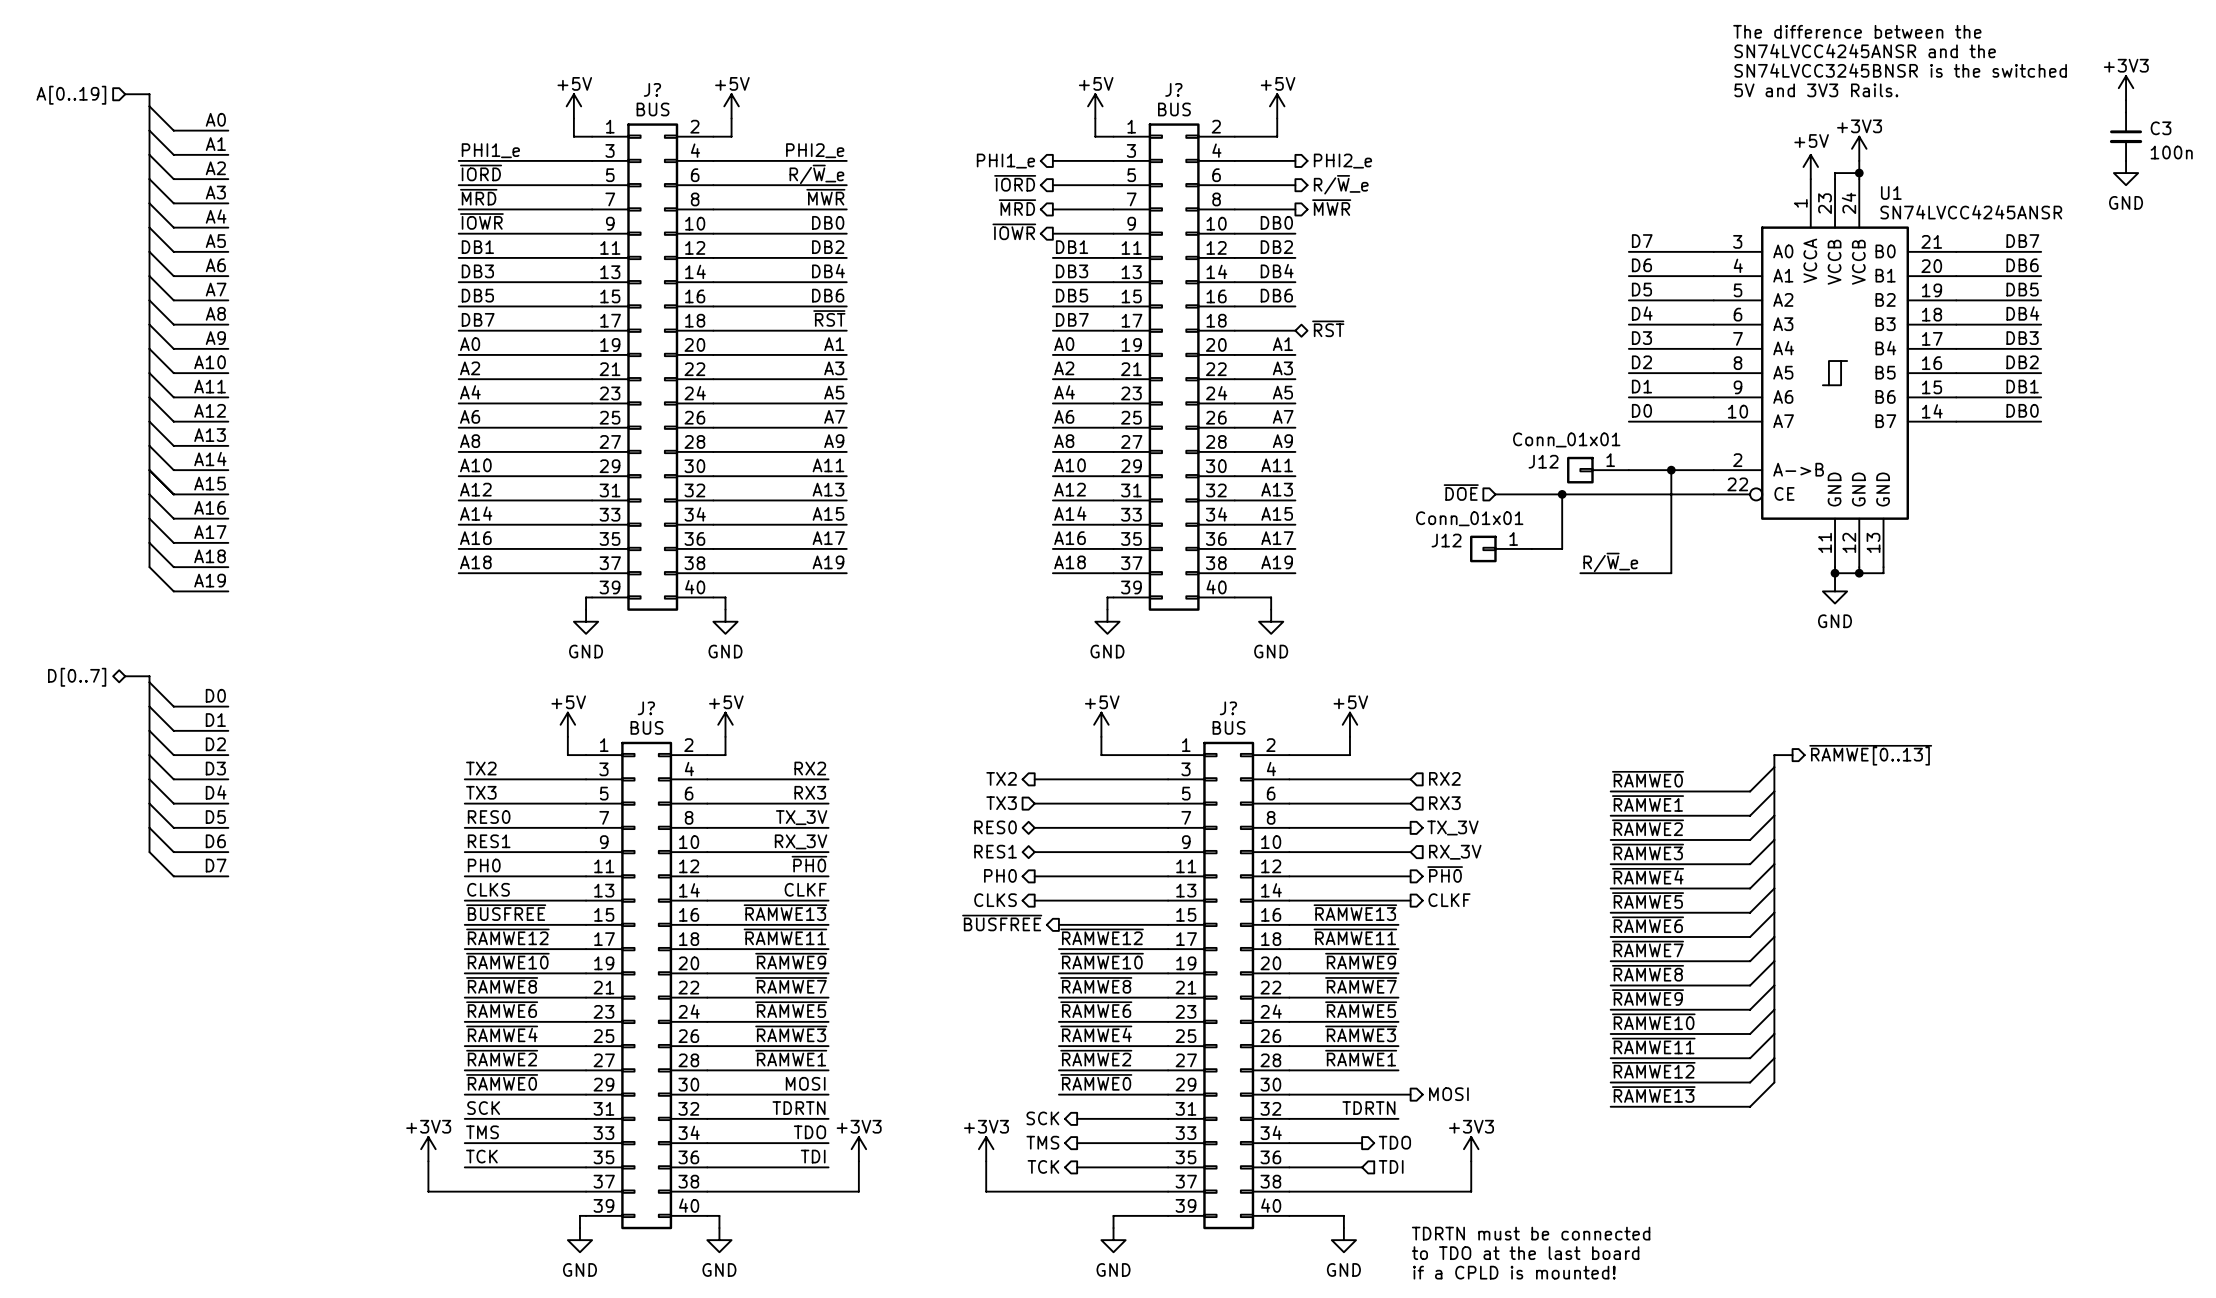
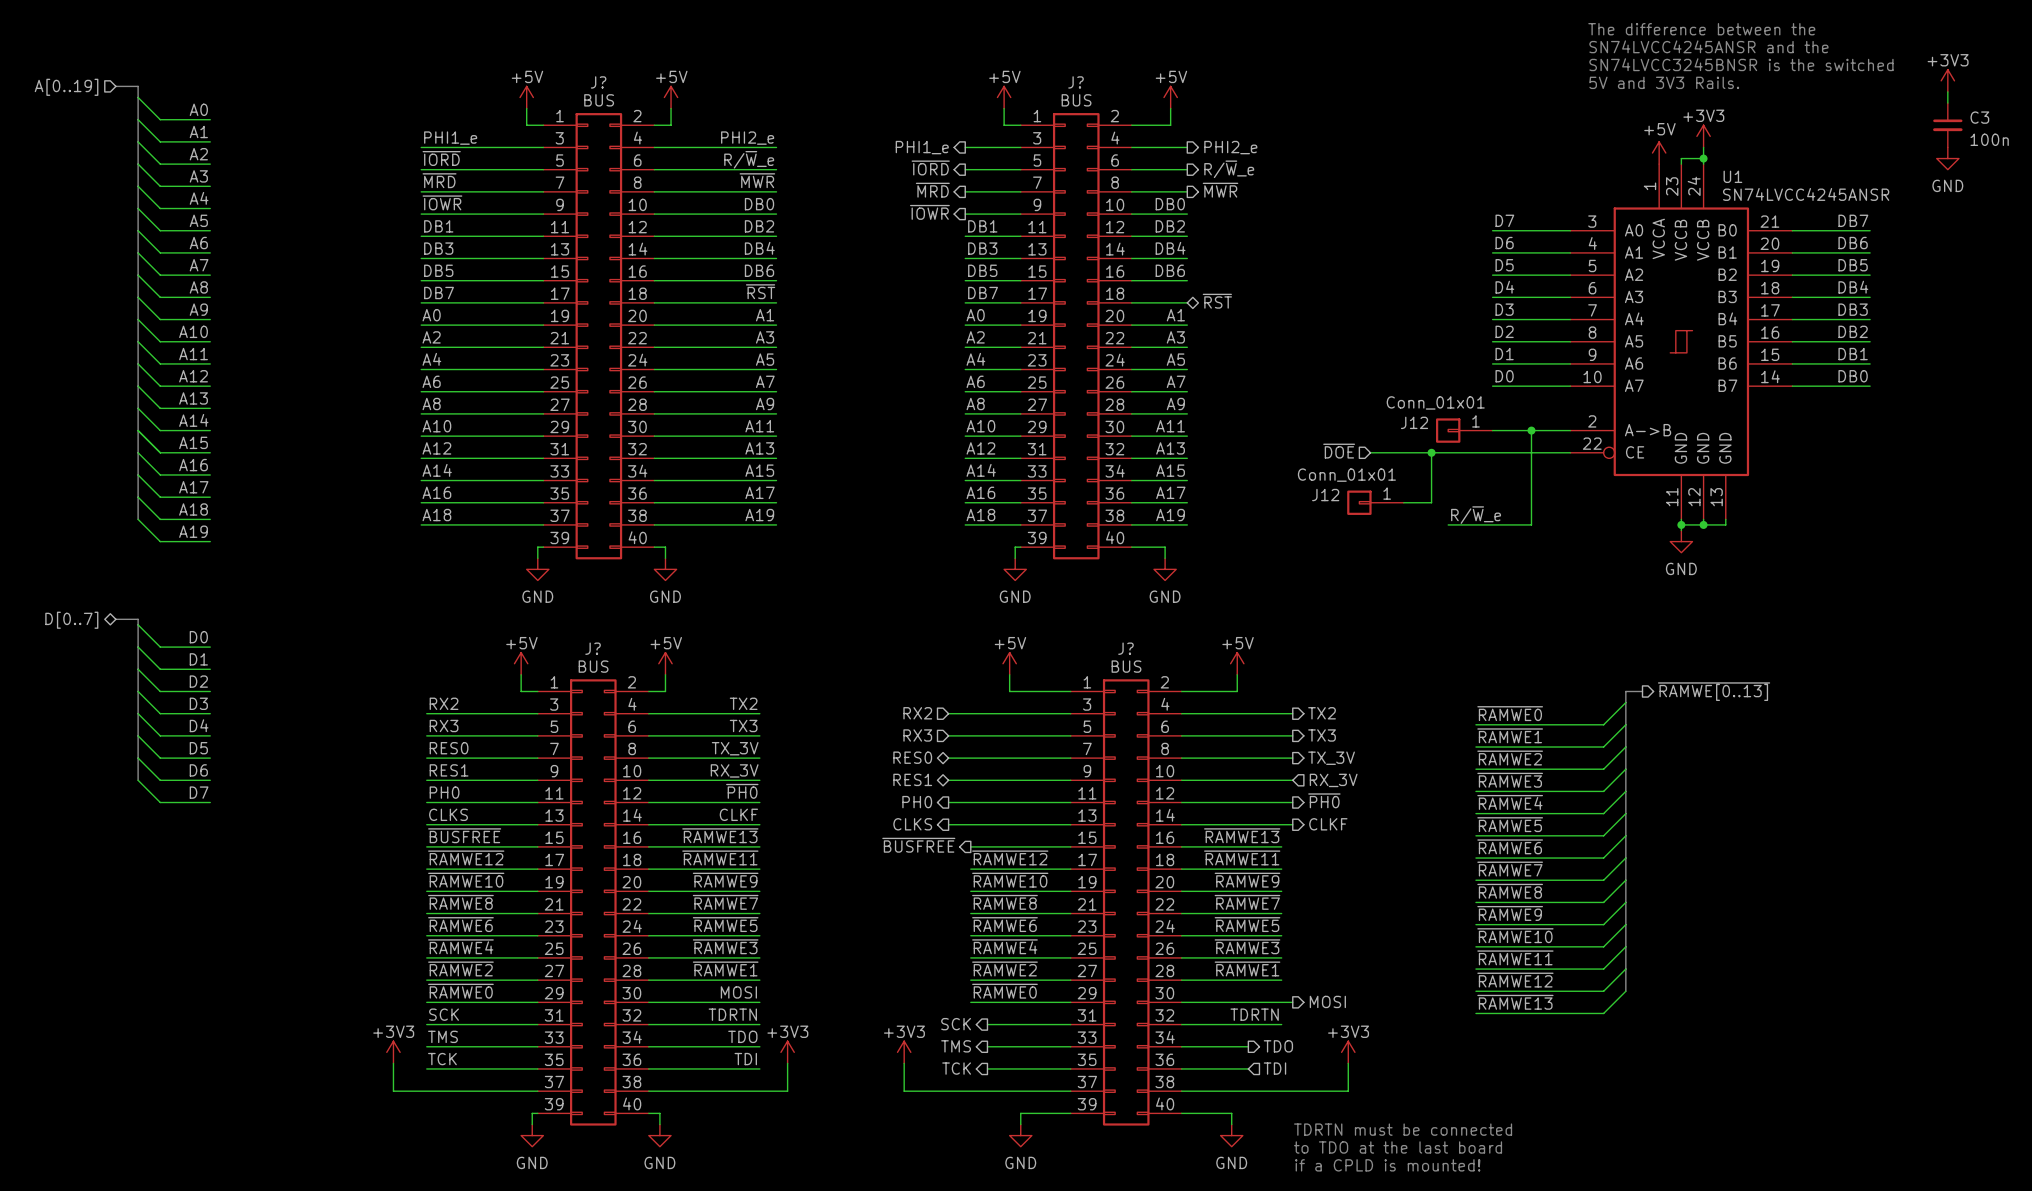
label: TX2 (481, 768) -> RX2 (444, 703)
label: RX2 (810, 768) -> TX2 (743, 703)
hierarchical label shape: output (1001, 778) -> input (917, 713)
hierarchical label: TX2 (1001, 778) -> RX2 (917, 713)
hierarchical label shape: input (1444, 778) -> output (1322, 713)
hierarchical label: RX2 (1444, 778) -> TX2 (1322, 713)
label: TX3 (481, 792) -> RX3 (444, 725)
label: RX3 (810, 792) -> TX3 (743, 725)
hierarchical label: TX3 (1001, 803) -> RX3 (917, 735)
hierarchical label shape: input (1444, 803) -> output (1322, 735)
hierarchical label: RX3 (1444, 803) -> TX3 (1322, 735)

